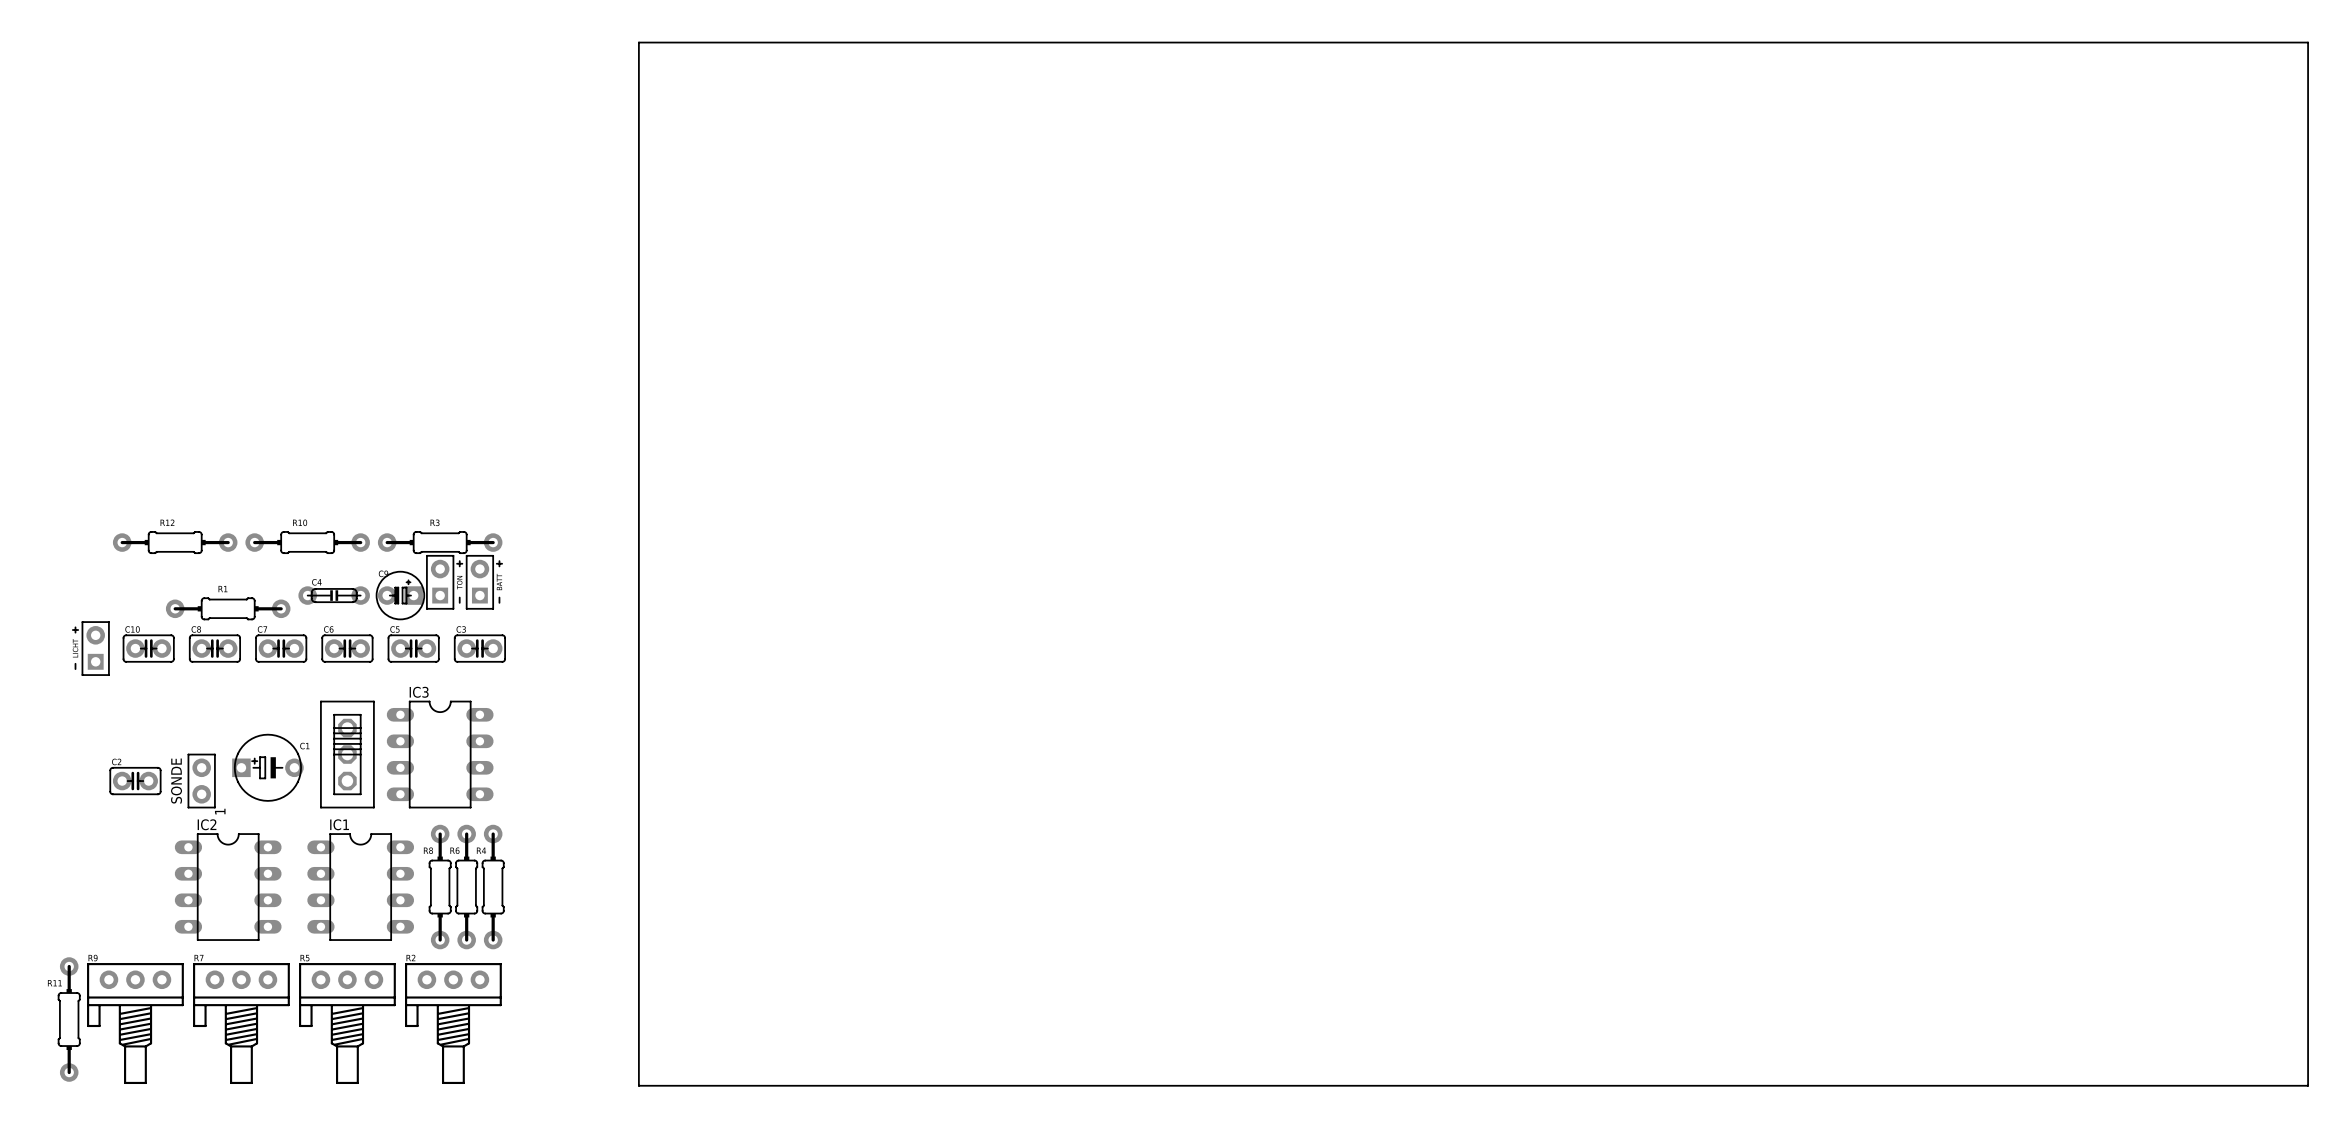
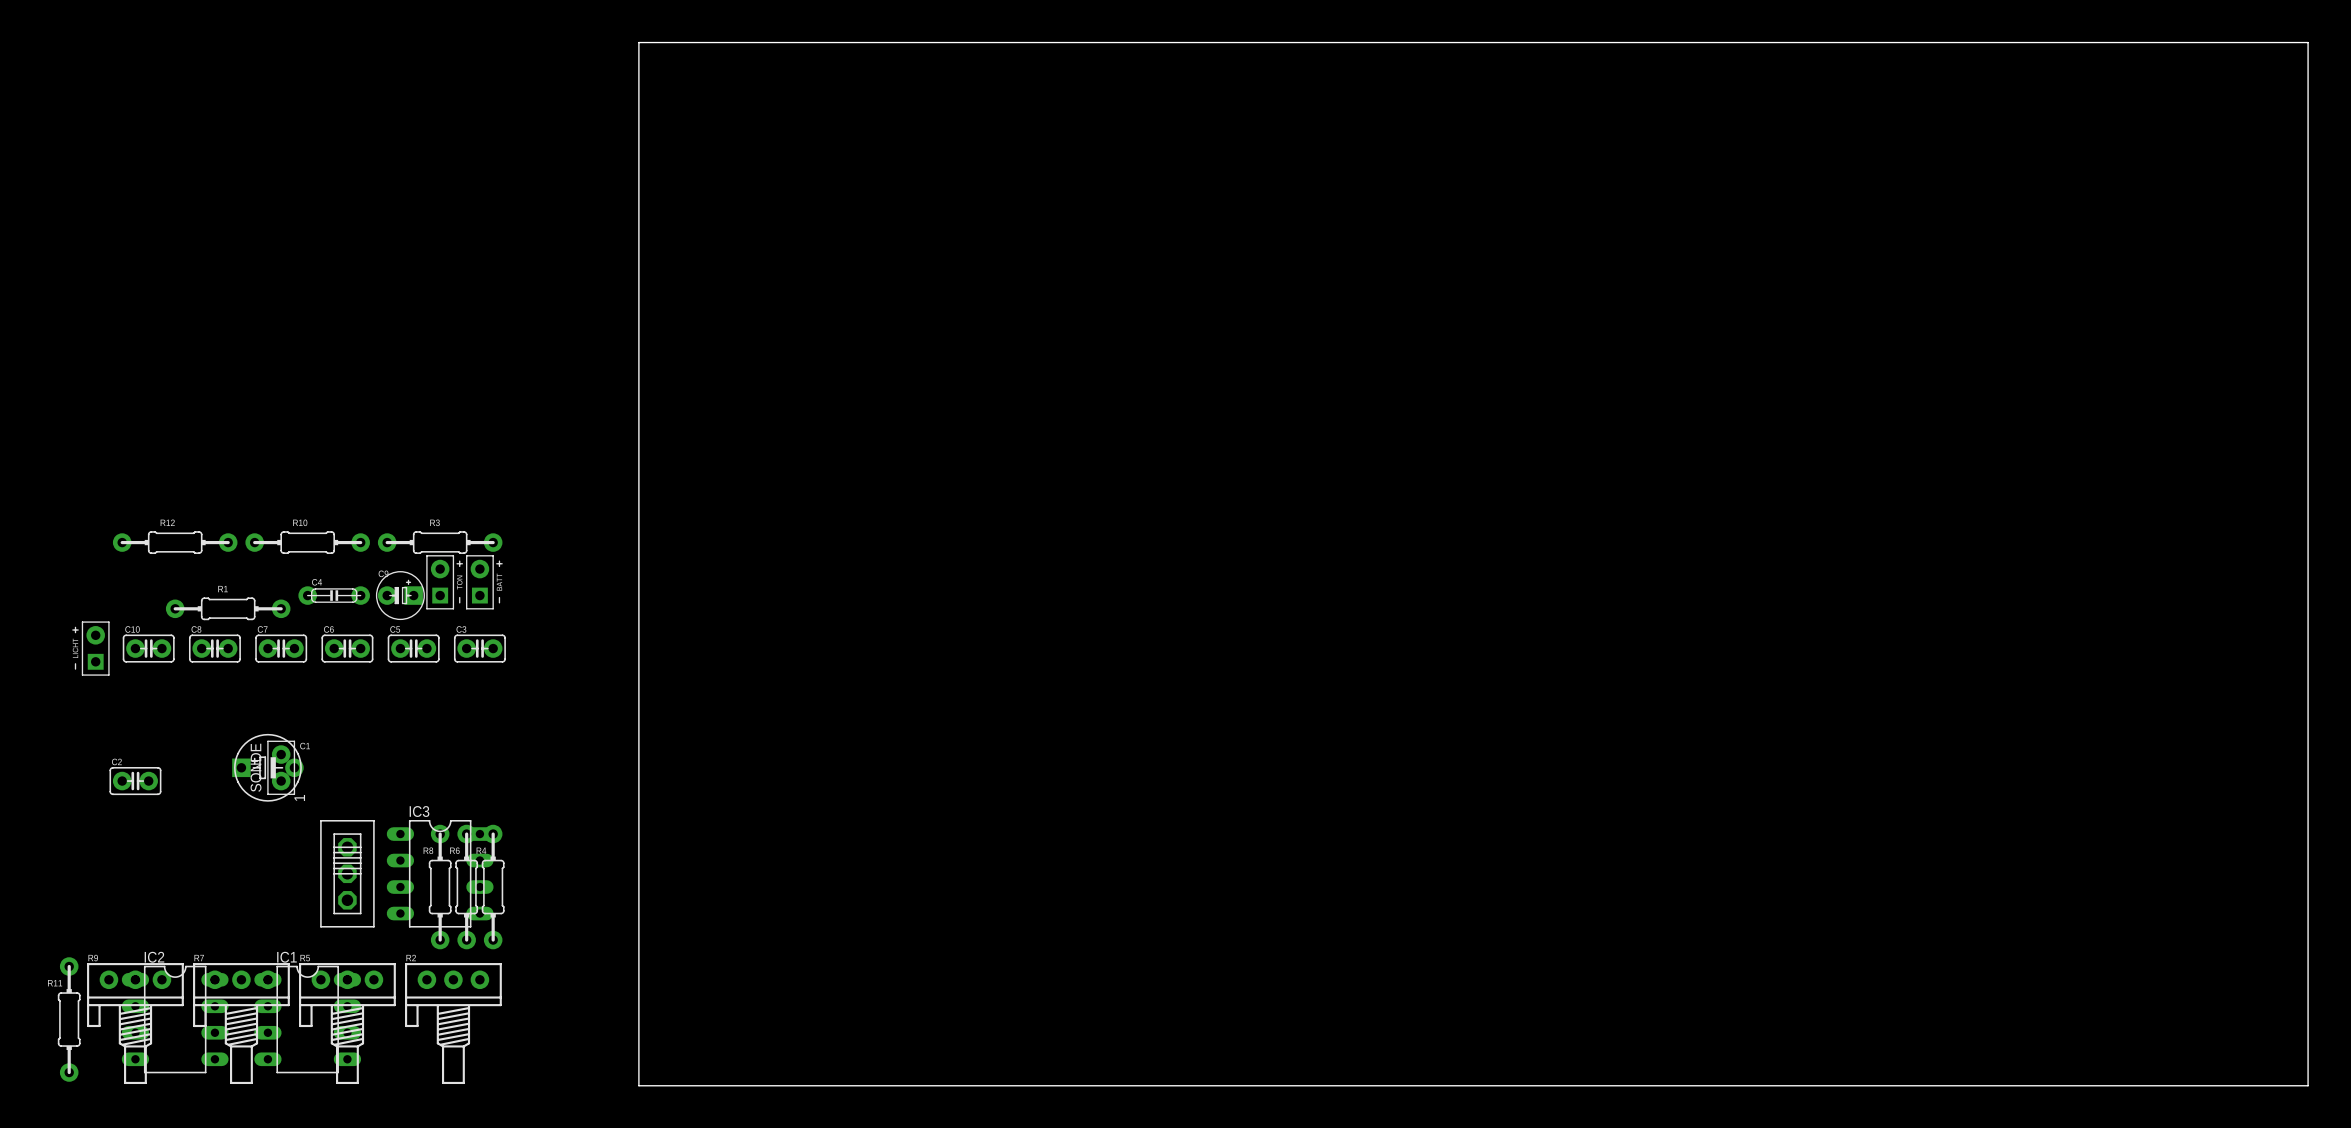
part position: (347, 754) -> (347, 873)
IC3 position: (440, 754) -> (440, 873)
SONDE position: (201, 781) -> (281, 767)
IC2 position: (228, 887) -> (175, 1019)
IC1 position: (360, 887) -> (307, 1019)

